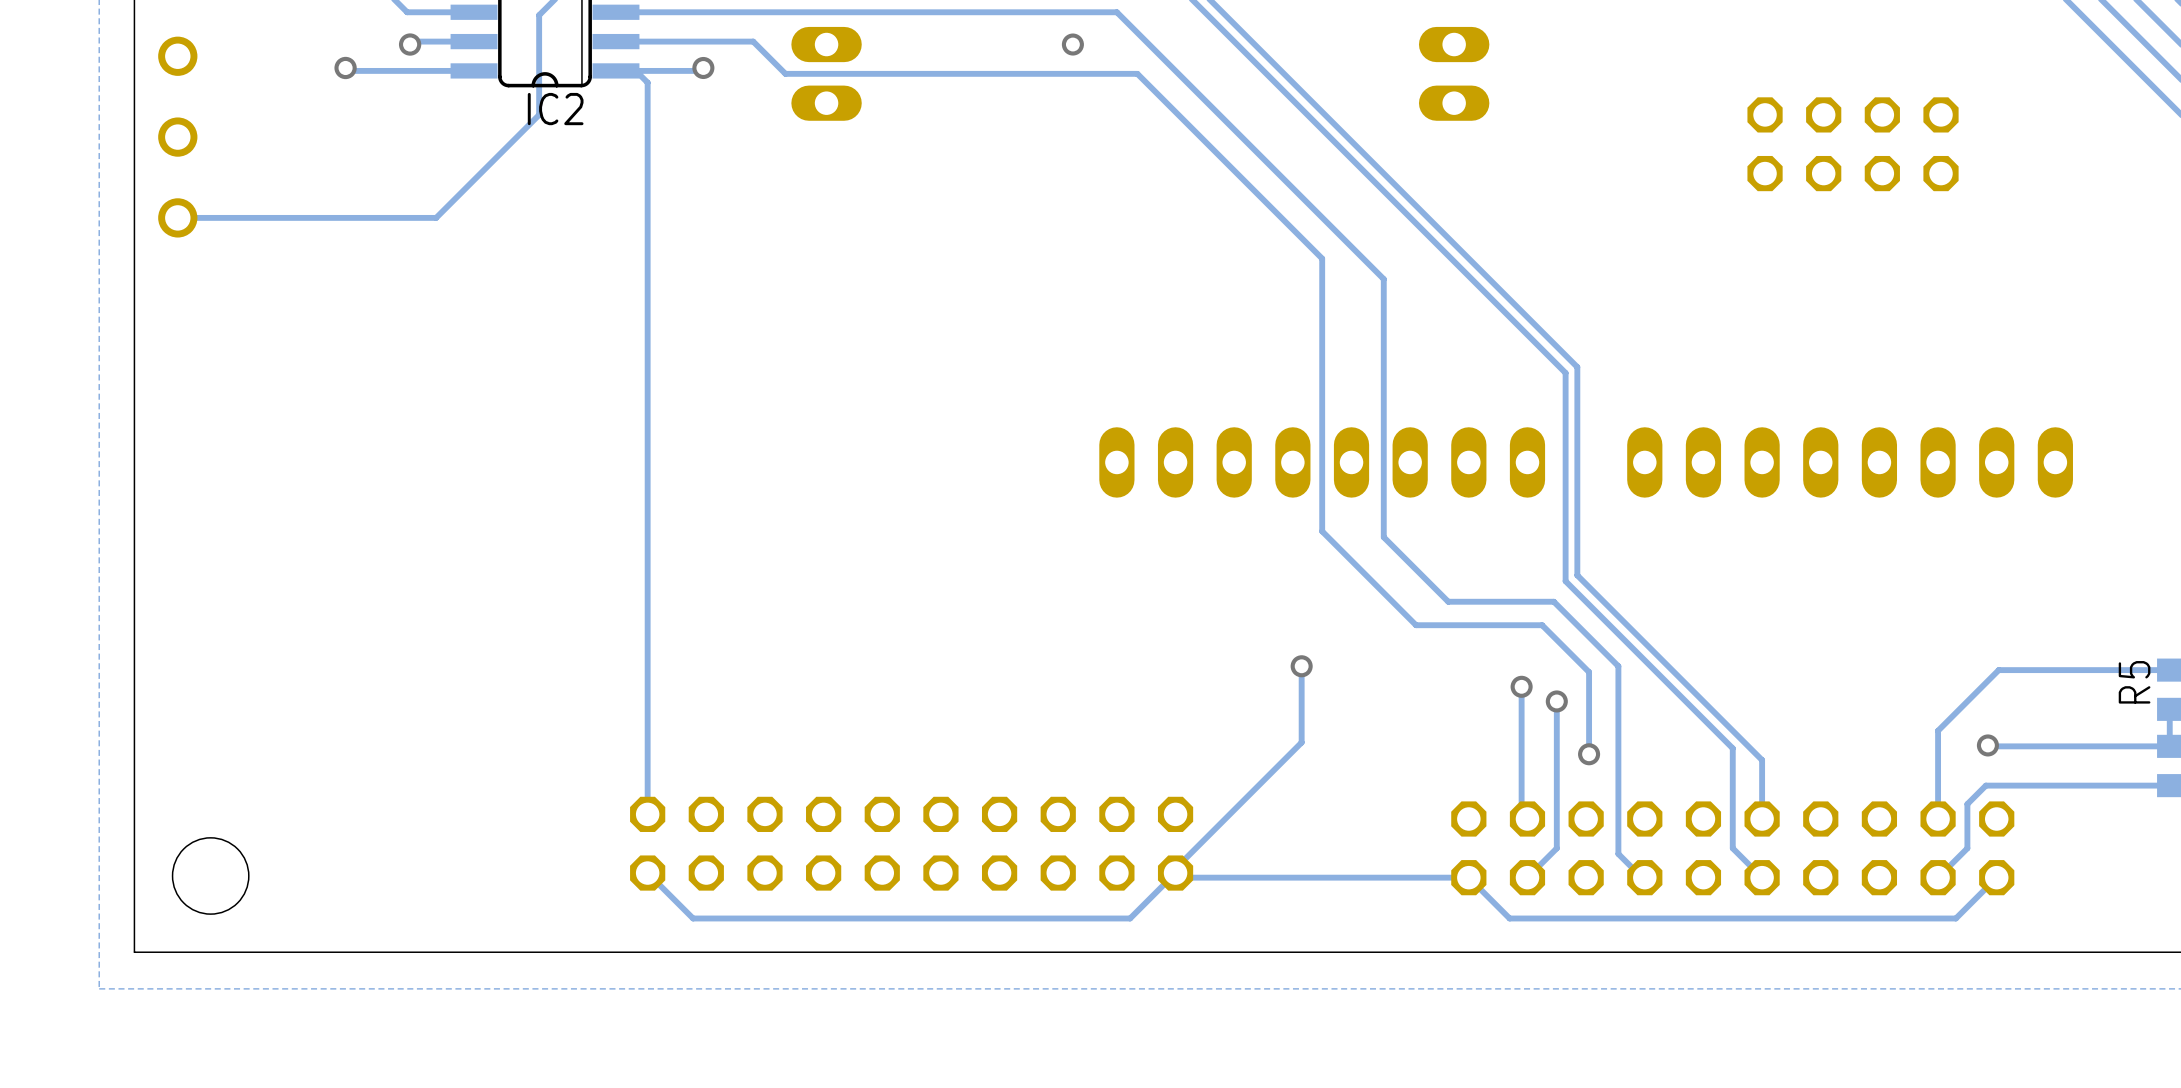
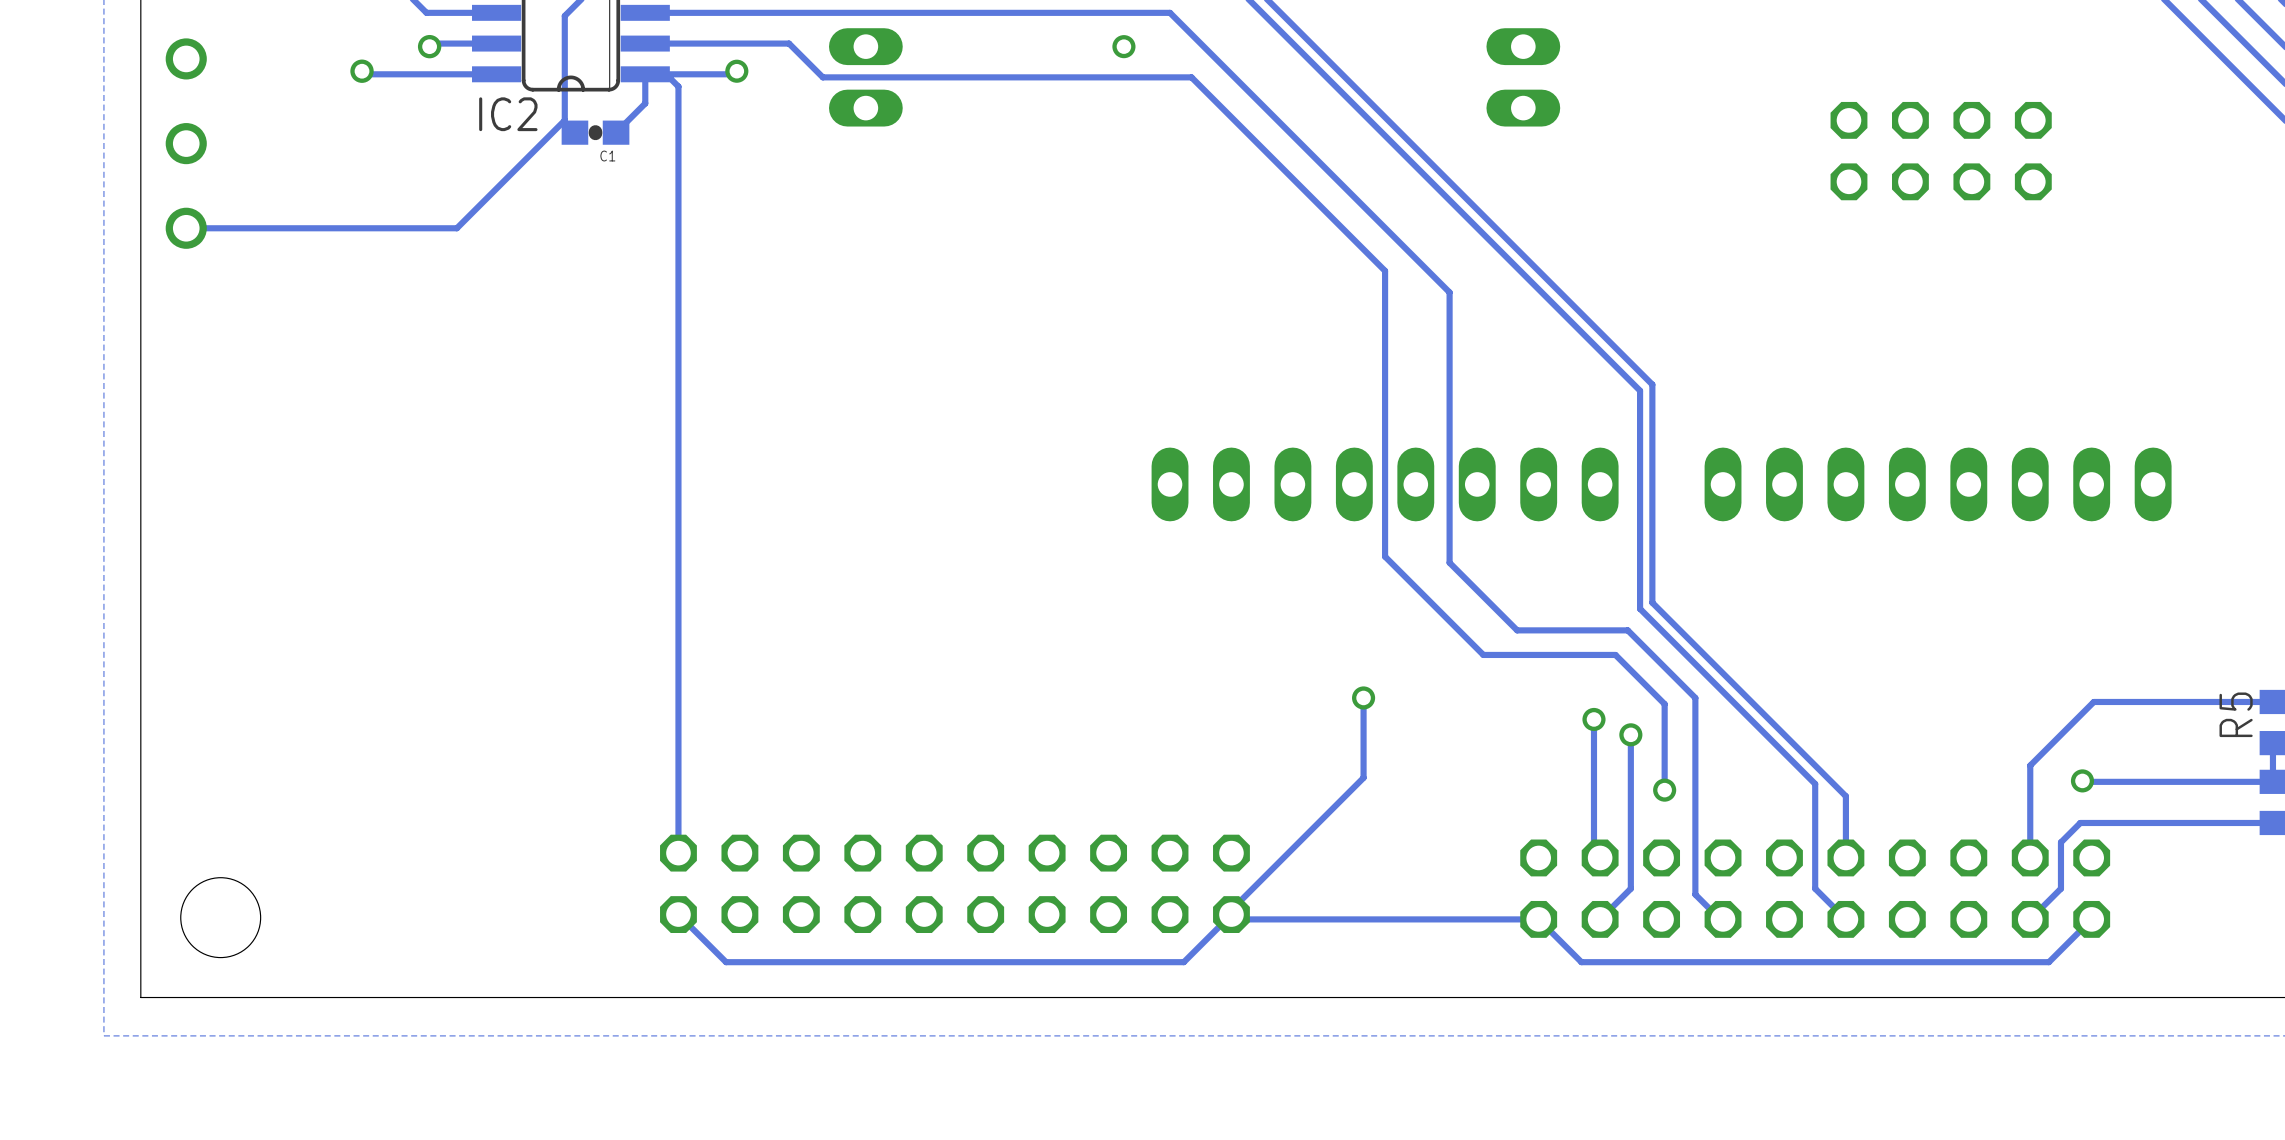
track: none -> (645, 74) (645, 103) (616, 132)
IC2 name position: IC2 (555, 109) -> IC2 (508, 114)
C1: none -> (595, 132)

